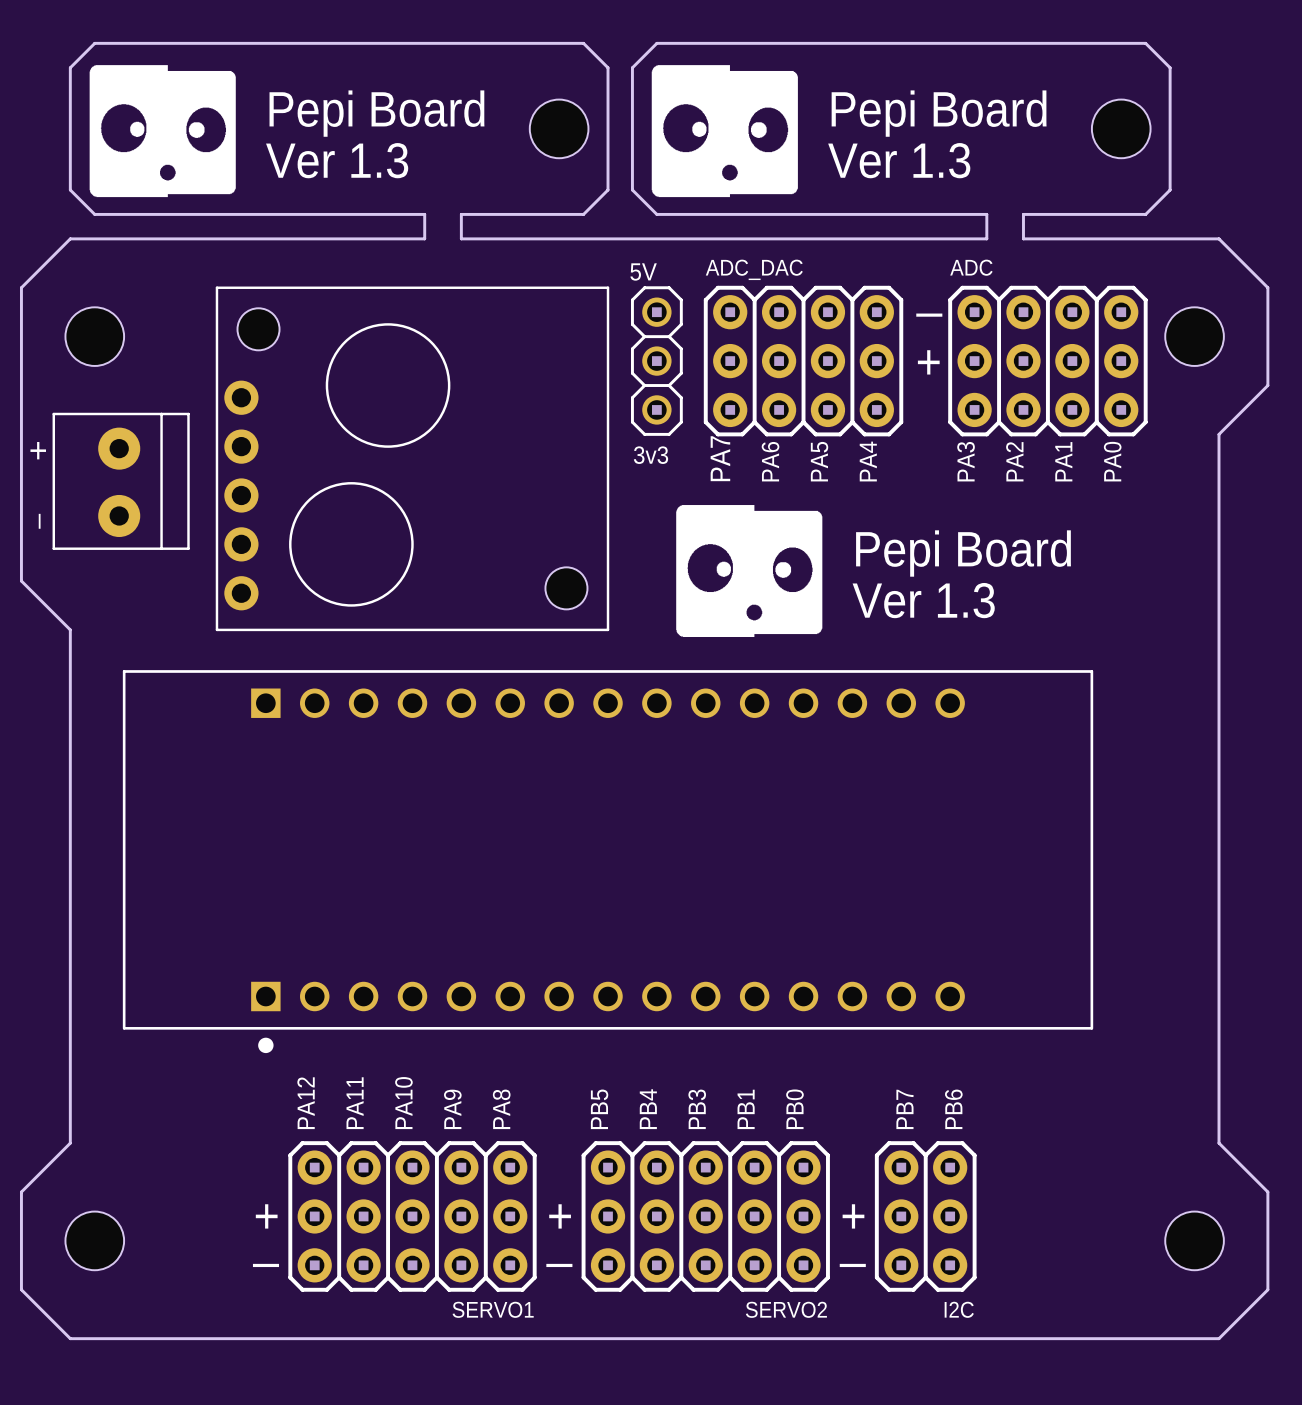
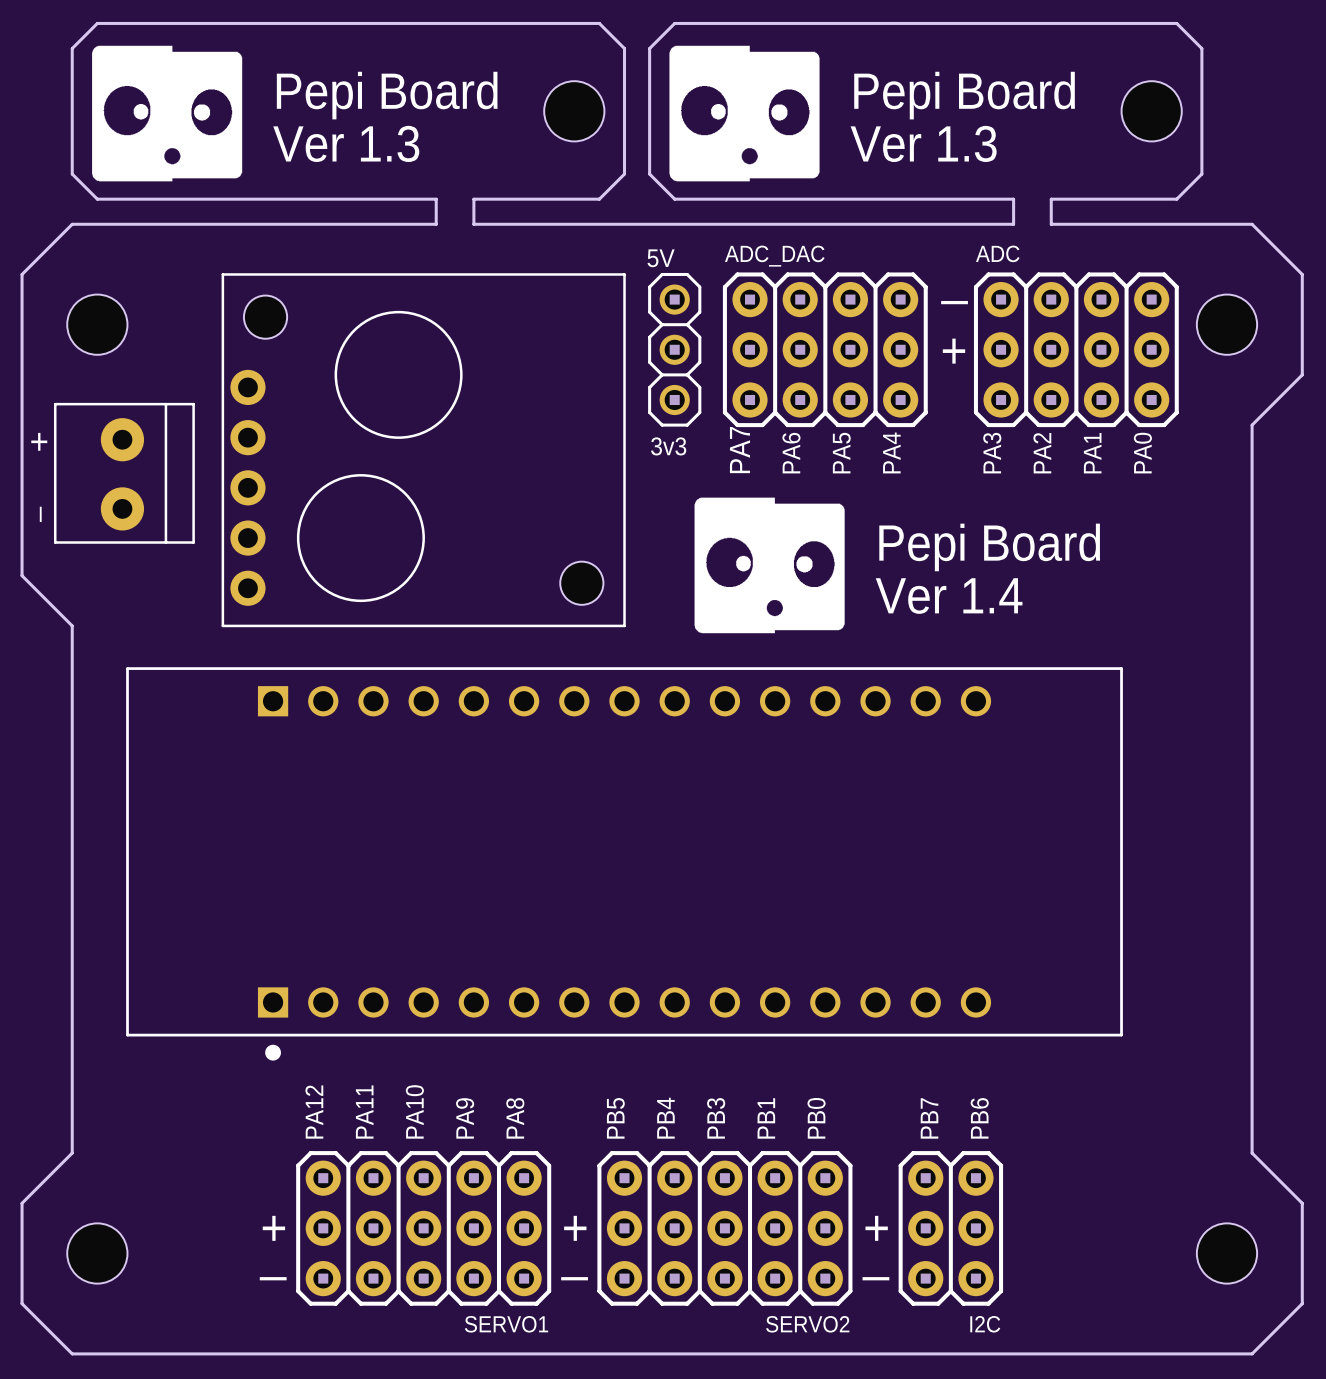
text: Ver 1.3 (923, 600) -> Ver 1.4 (949, 596)

